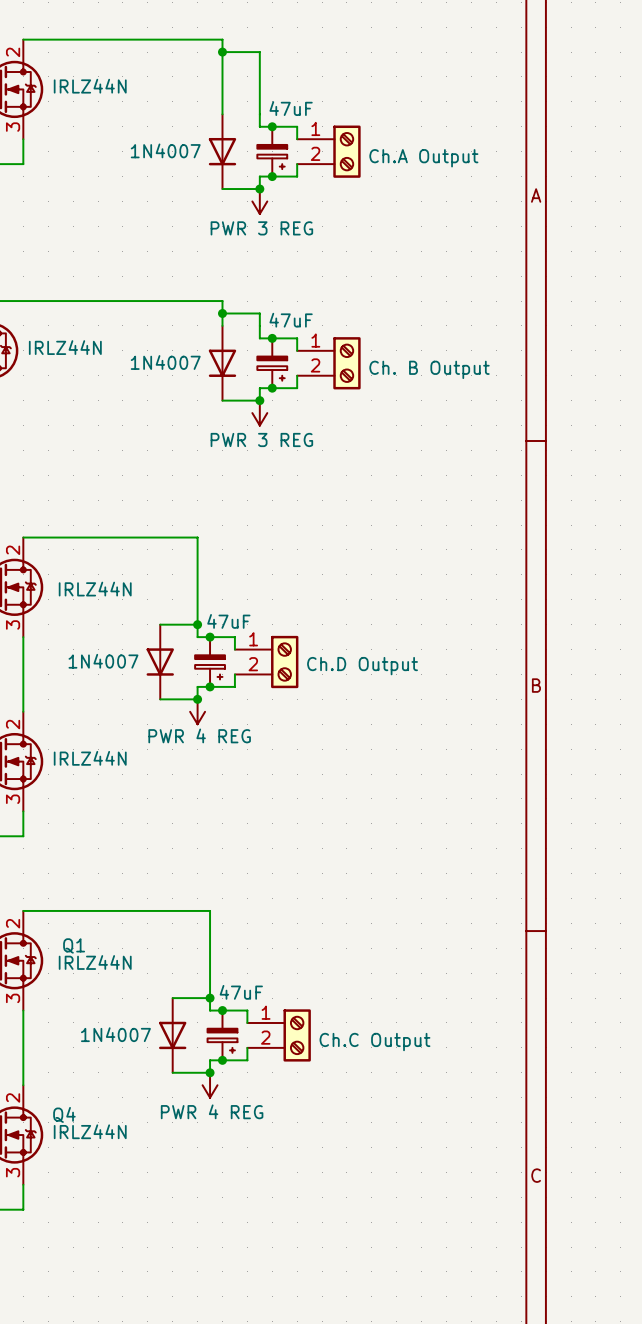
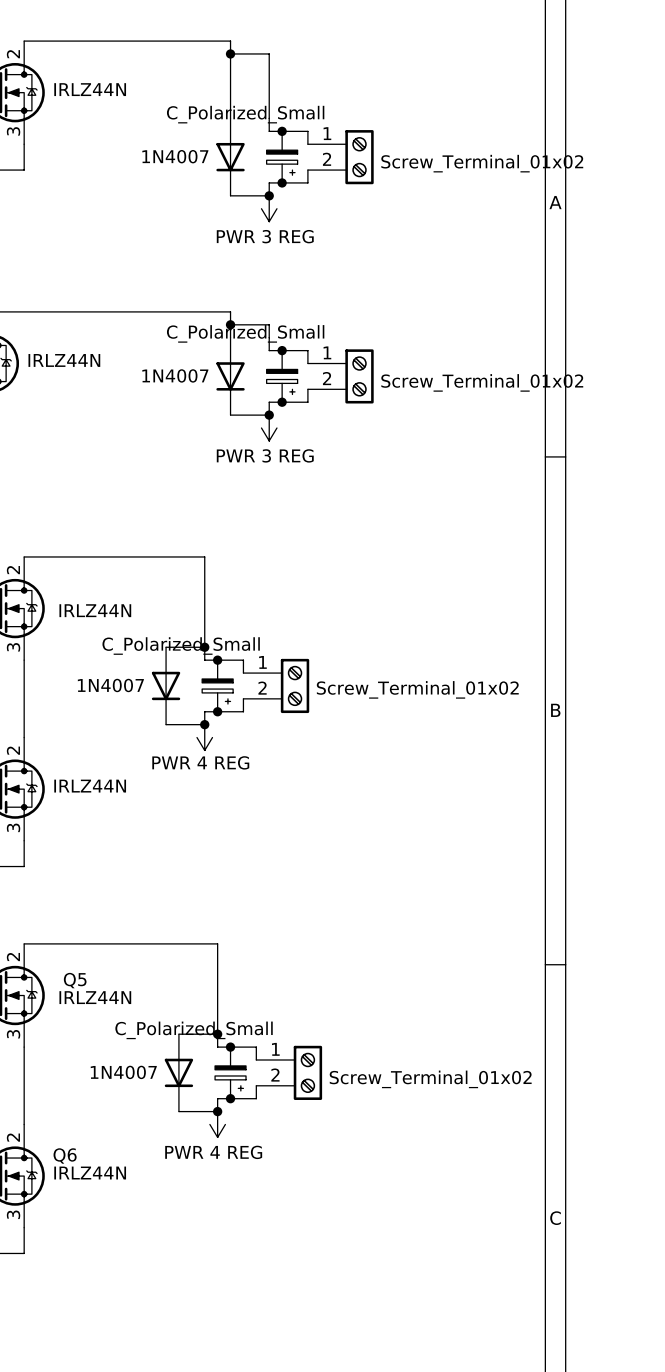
part value: 47uF (291, 108) -> C_Polarized_Small (245, 114)
part value: Ch.A Output (423, 158) -> Screw_Terminal_01x02 (482, 163)
part value: 47uF (291, 320) -> C_Polarized_Small (245, 333)
part value: Ch. B Output (429, 369) -> Screw_Terminal_01x02 (482, 382)
part value: 47uF (228, 621) -> C_Polarized_Small (181, 646)
part value: Ch.D Output (362, 666) -> Screw_Terminal_01x02 (417, 689)
Q1 name: Q1 (74, 945) -> Q5 (75, 980)
part value: 47uF (241, 992) -> C_Polarized_Small (194, 1030)
part value: Ch.C Output (374, 1042) -> Screw_Terminal_01x02 (430, 1079)
Q4 name: Q4 (64, 1114) -> Q6 (65, 1155)

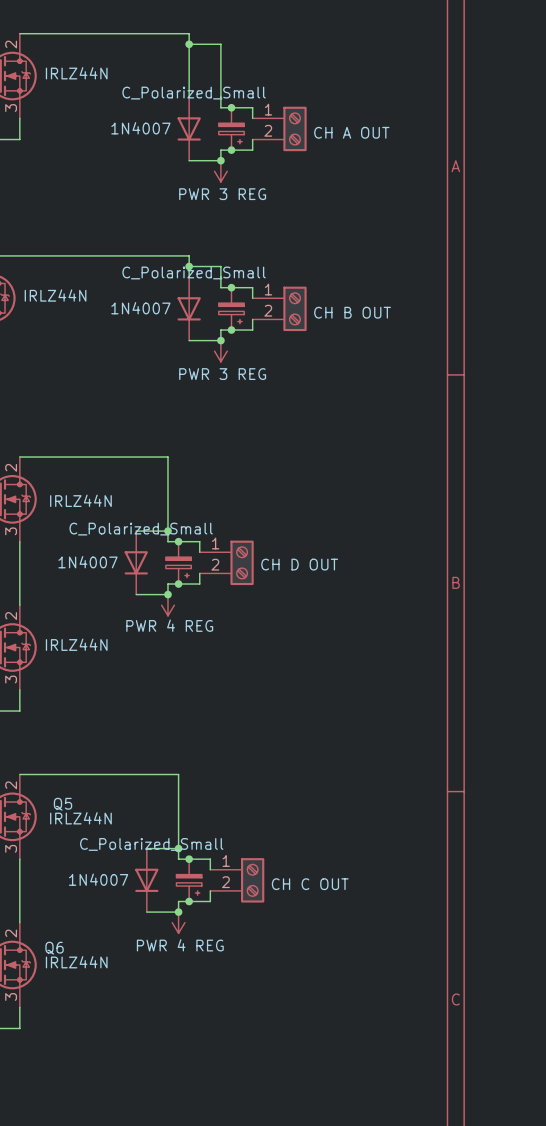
part value: Screw_Terminal_01x02 (482, 163) -> CH A OUT (351, 132)
part value: Screw_Terminal_01x02 (482, 382) -> CH B OUT (352, 312)
part value: Screw_Terminal_01x02 (417, 689) -> CH D OUT (299, 564)
part value: Screw_Terminal_01x02 (430, 1079) -> CH C OUT (310, 884)

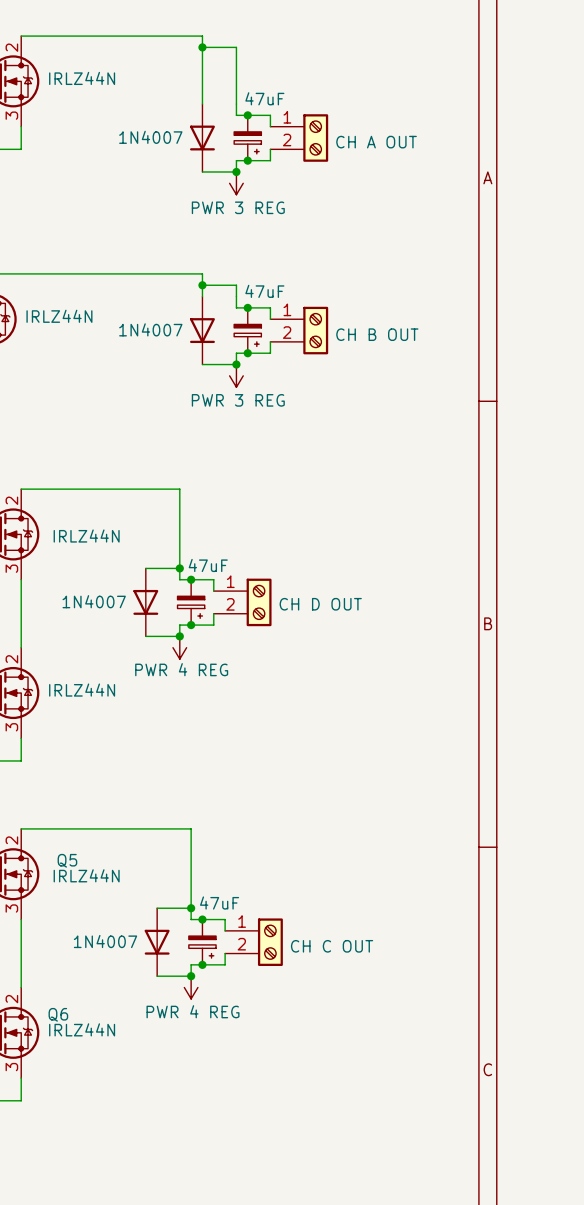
part value: C_Polarized_Small (194, 93) -> 47uF (264, 98)
part value: C_Polarized_Small (194, 272) -> 47uF (264, 291)
part value: C_Polarized_Small (141, 529) -> 47uF (208, 565)
part value: C_Polarized_Small (151, 844) -> 47uF (219, 903)

